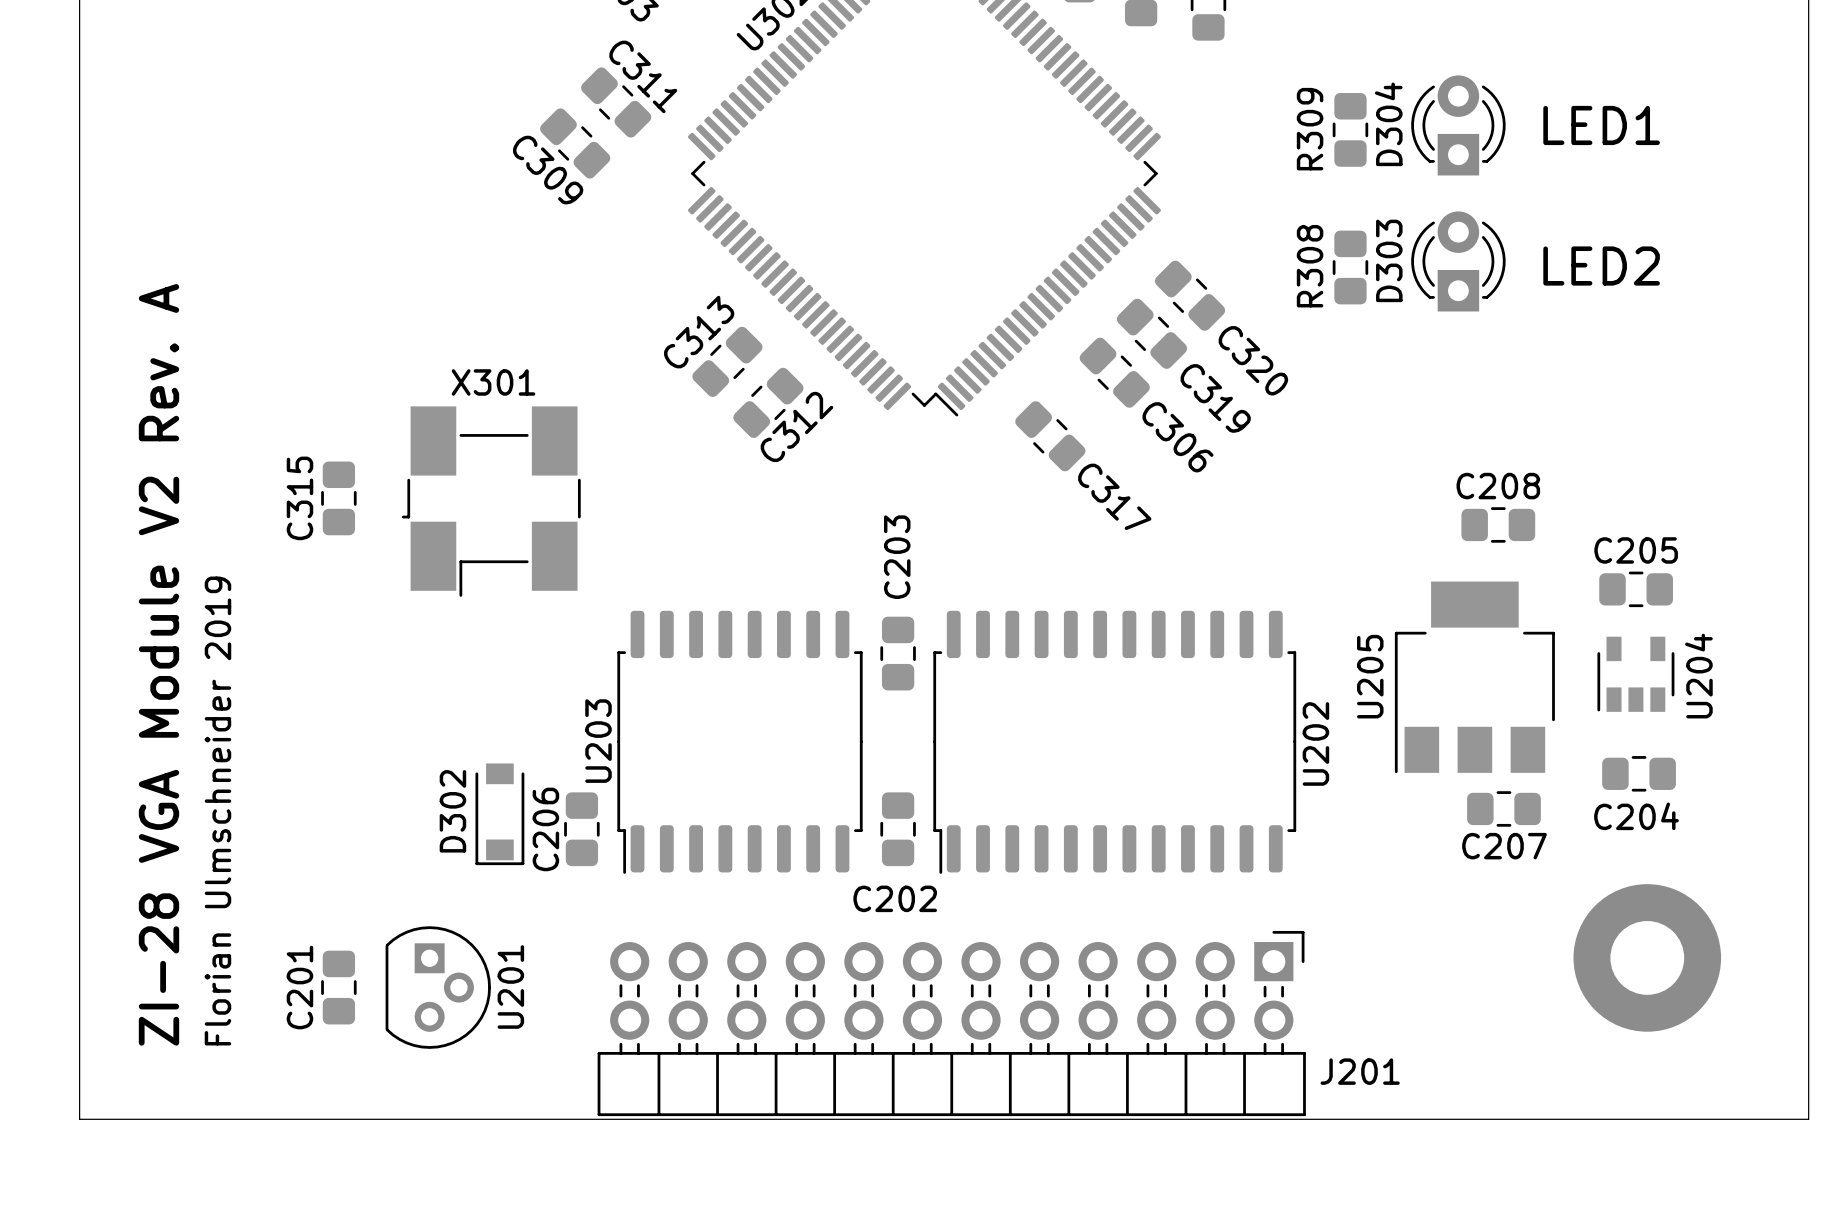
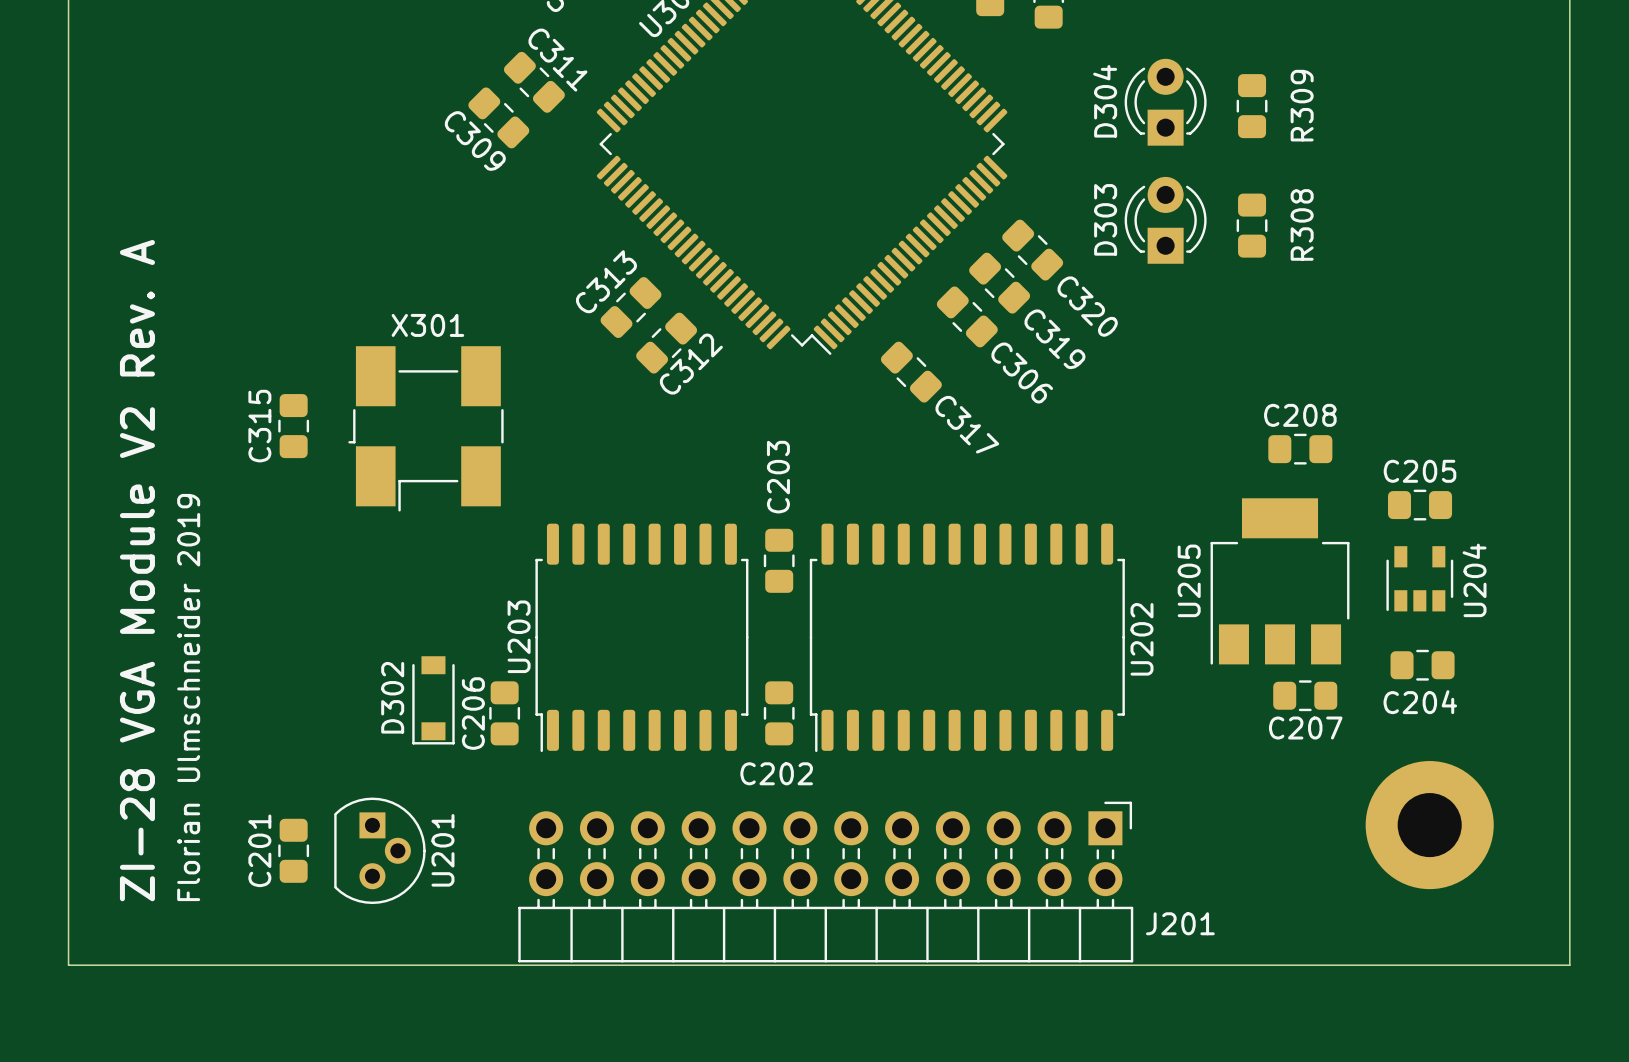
D304 position: (1458, 125) -> (1165, 102)
text: LED1 (1601, 125) -> none
R309 name position: R309 (1310, 129) -> R309 (1302, 105)
R309 position: (1350, 129) -> (1252, 106)
D303 position: (1458, 261) -> (1165, 220)
R308 name position: R308 (1310, 266) -> R308 (1302, 224)
text: LED2 (1601, 266) -> none
R308 position: (1350, 267) -> (1252, 225)

